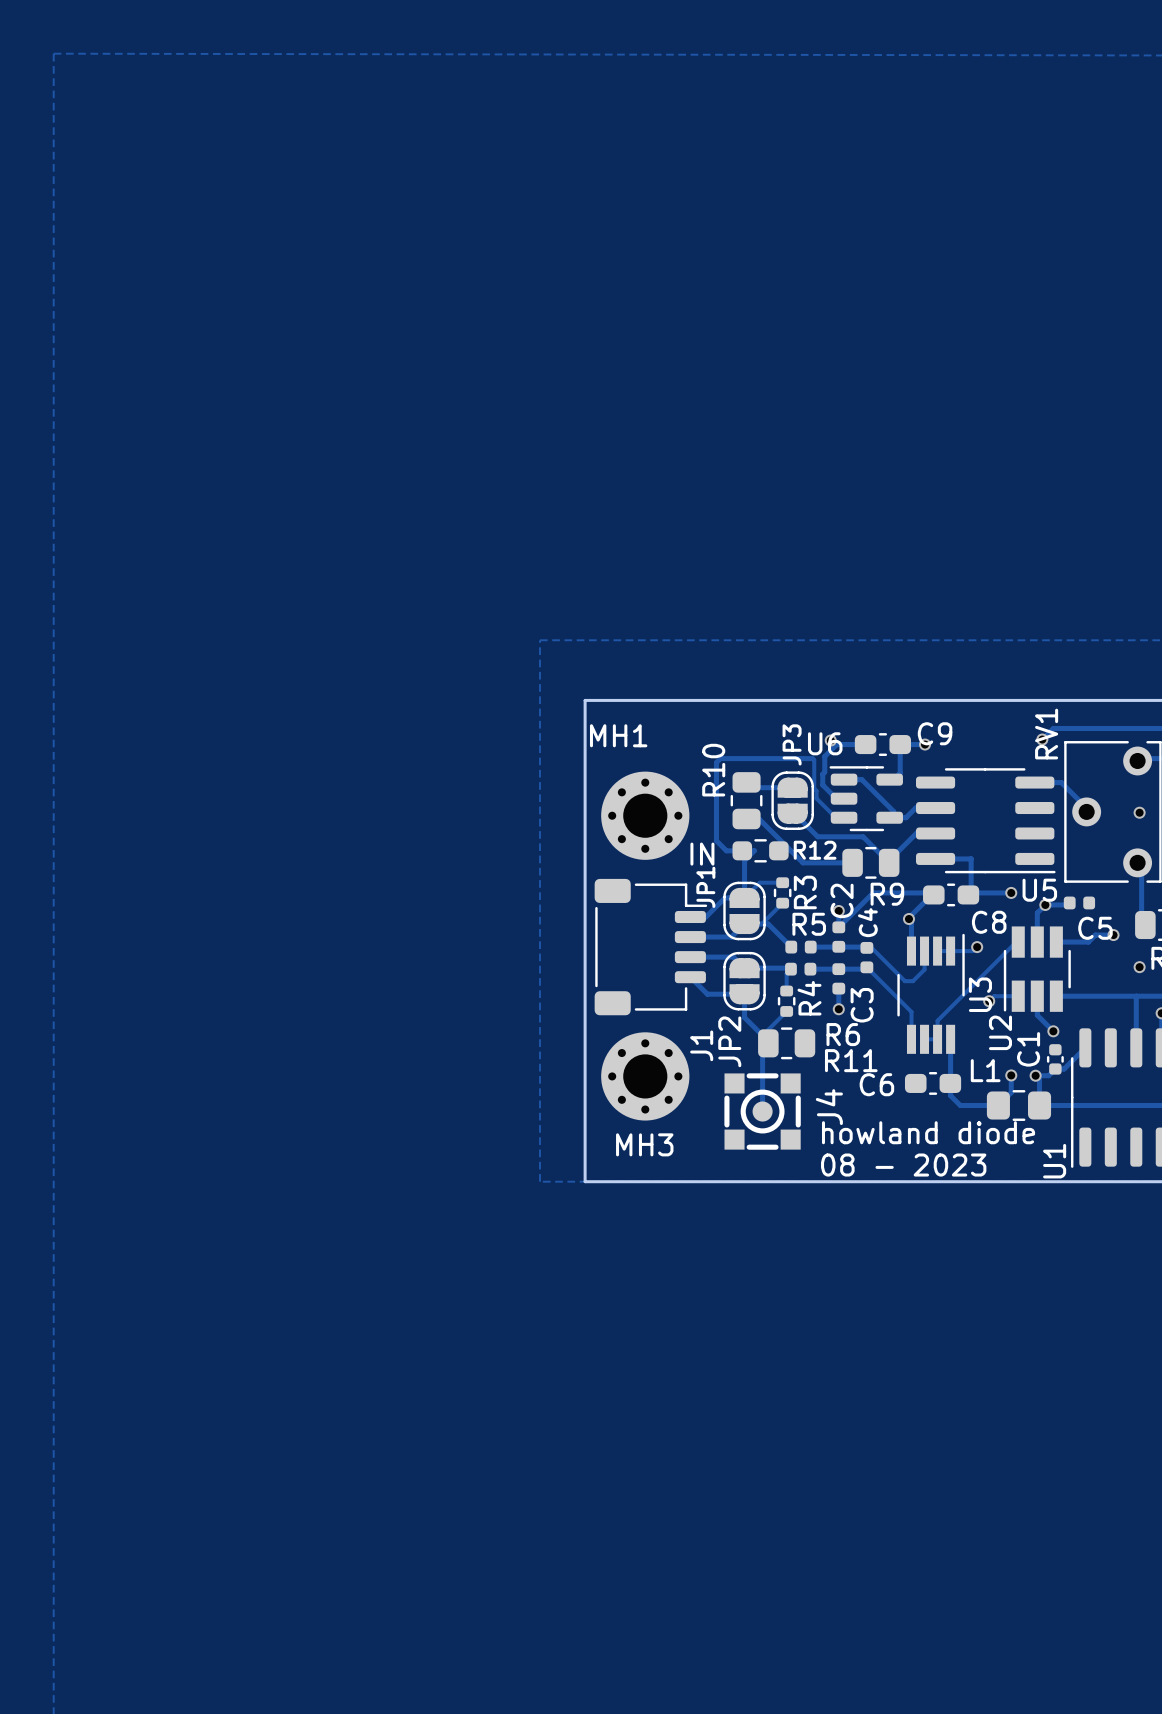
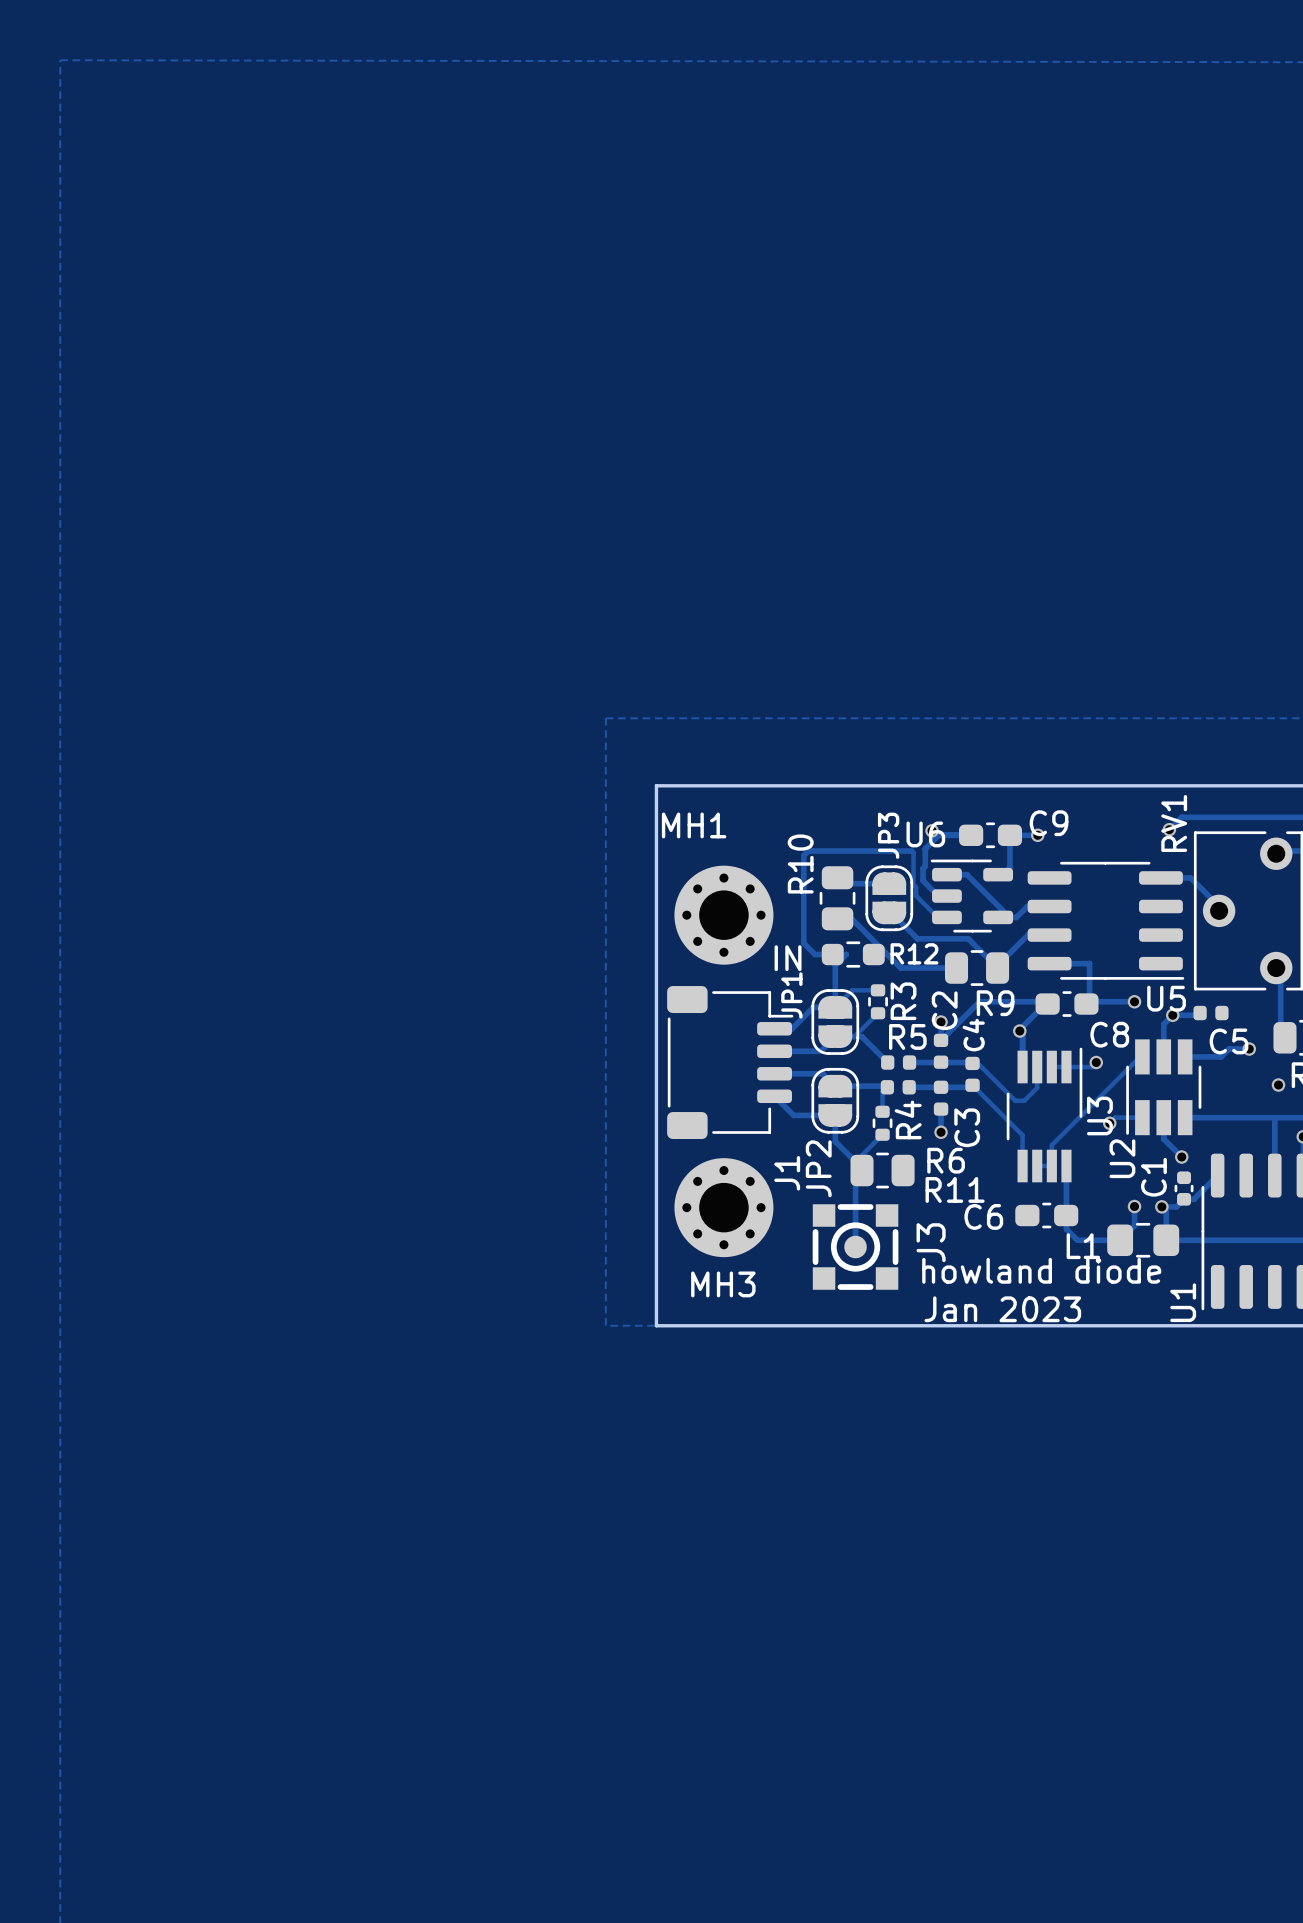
via: (1139, 812) -> none
L1 name position: L1 (985, 1070) -> L1 (1083, 1246)
J4 name: J4 (829, 1107) -> J3 (931, 1242)
text: 08 - 2023 (903, 1165) -> Jan 2023 (1002, 1309)

